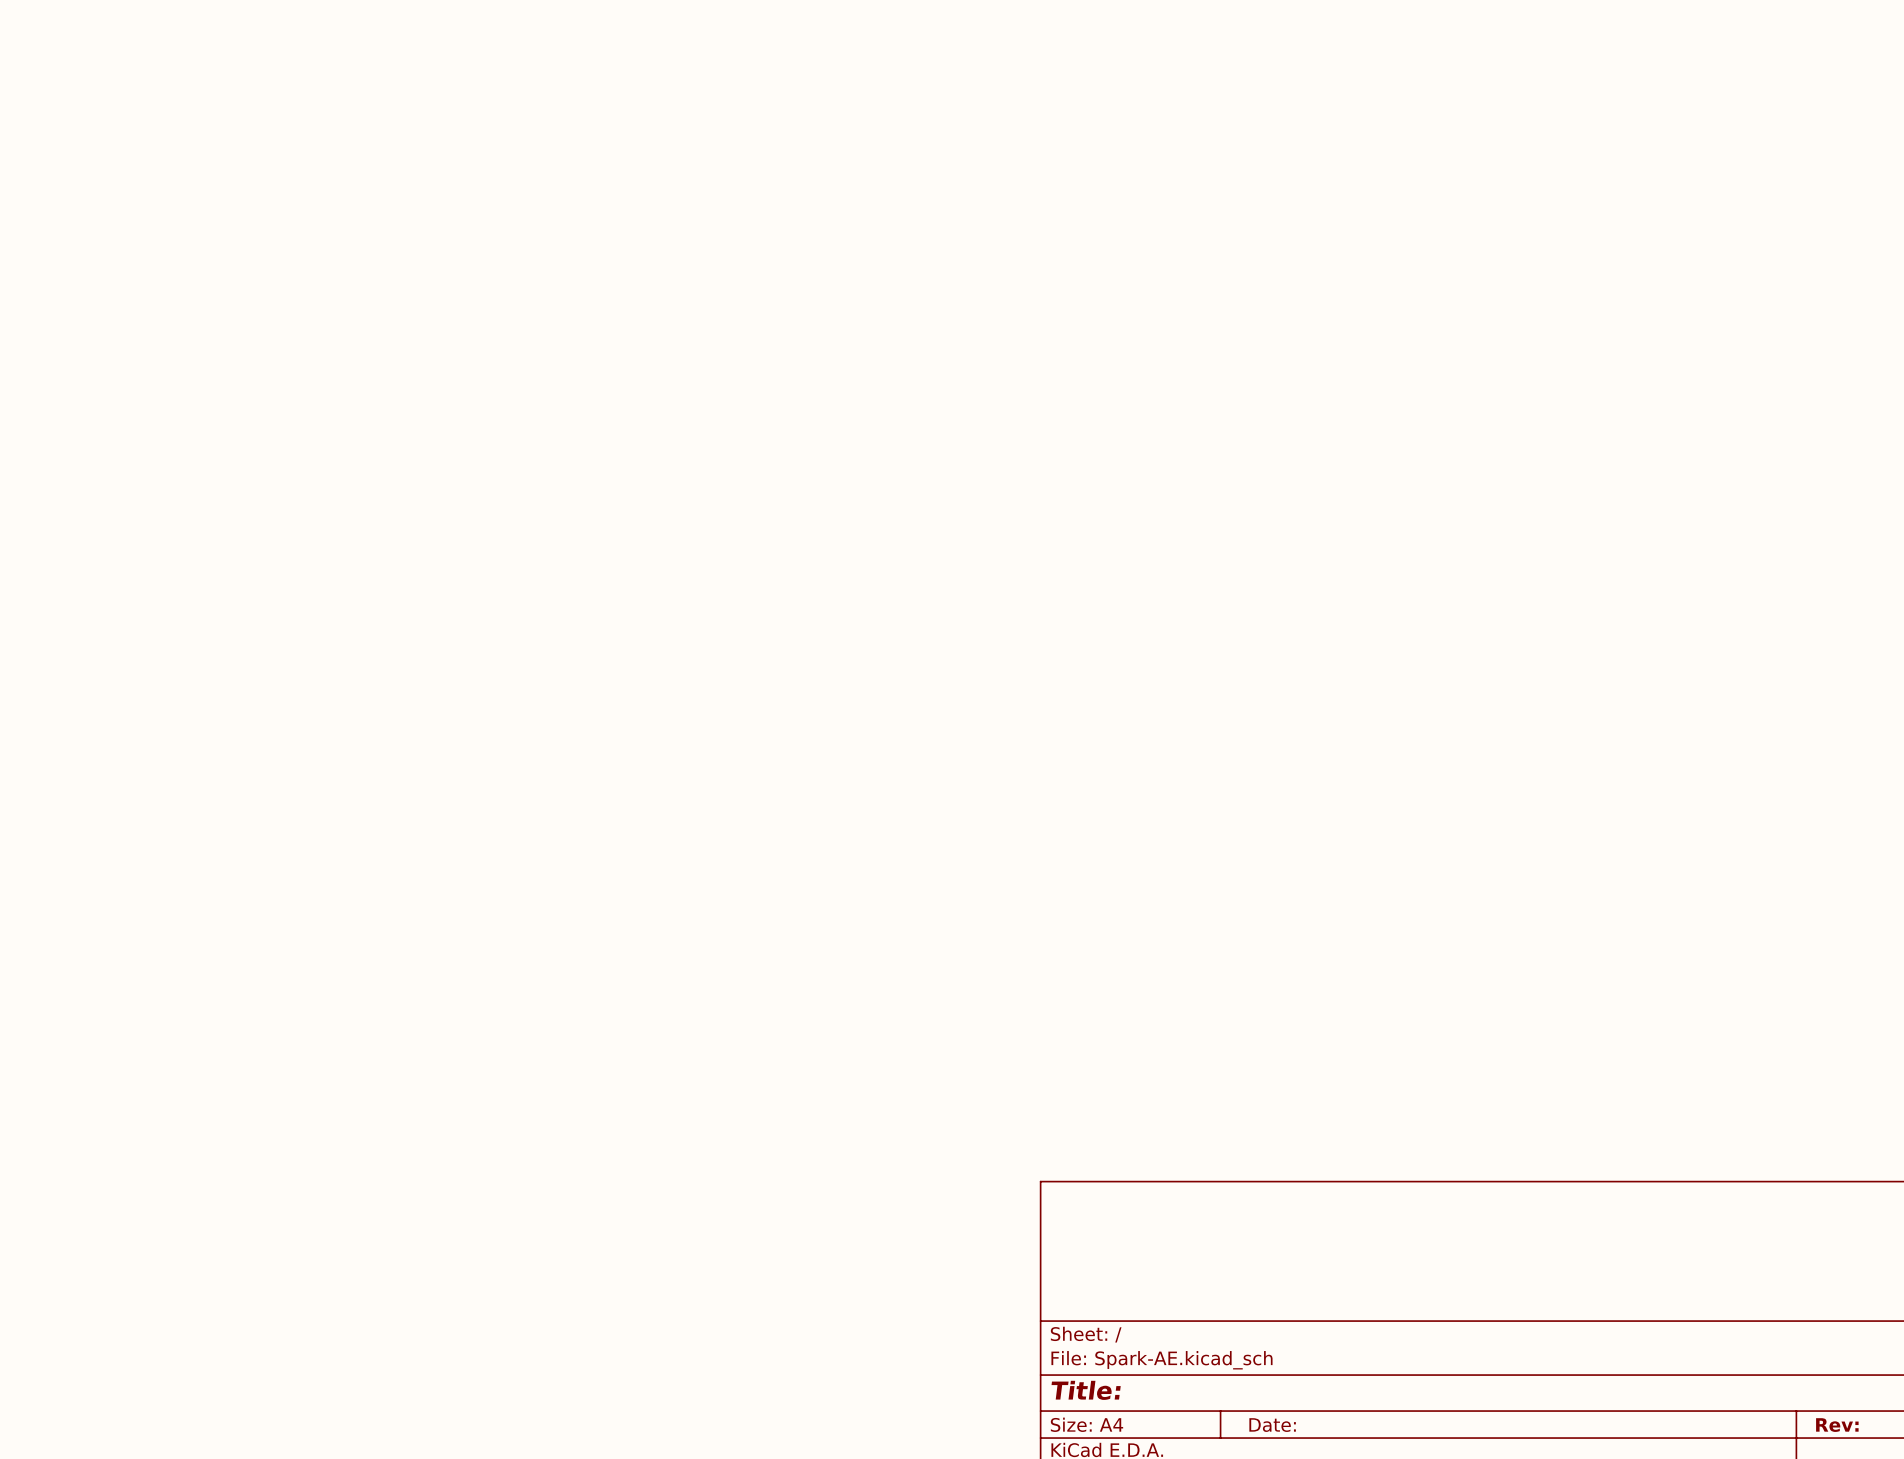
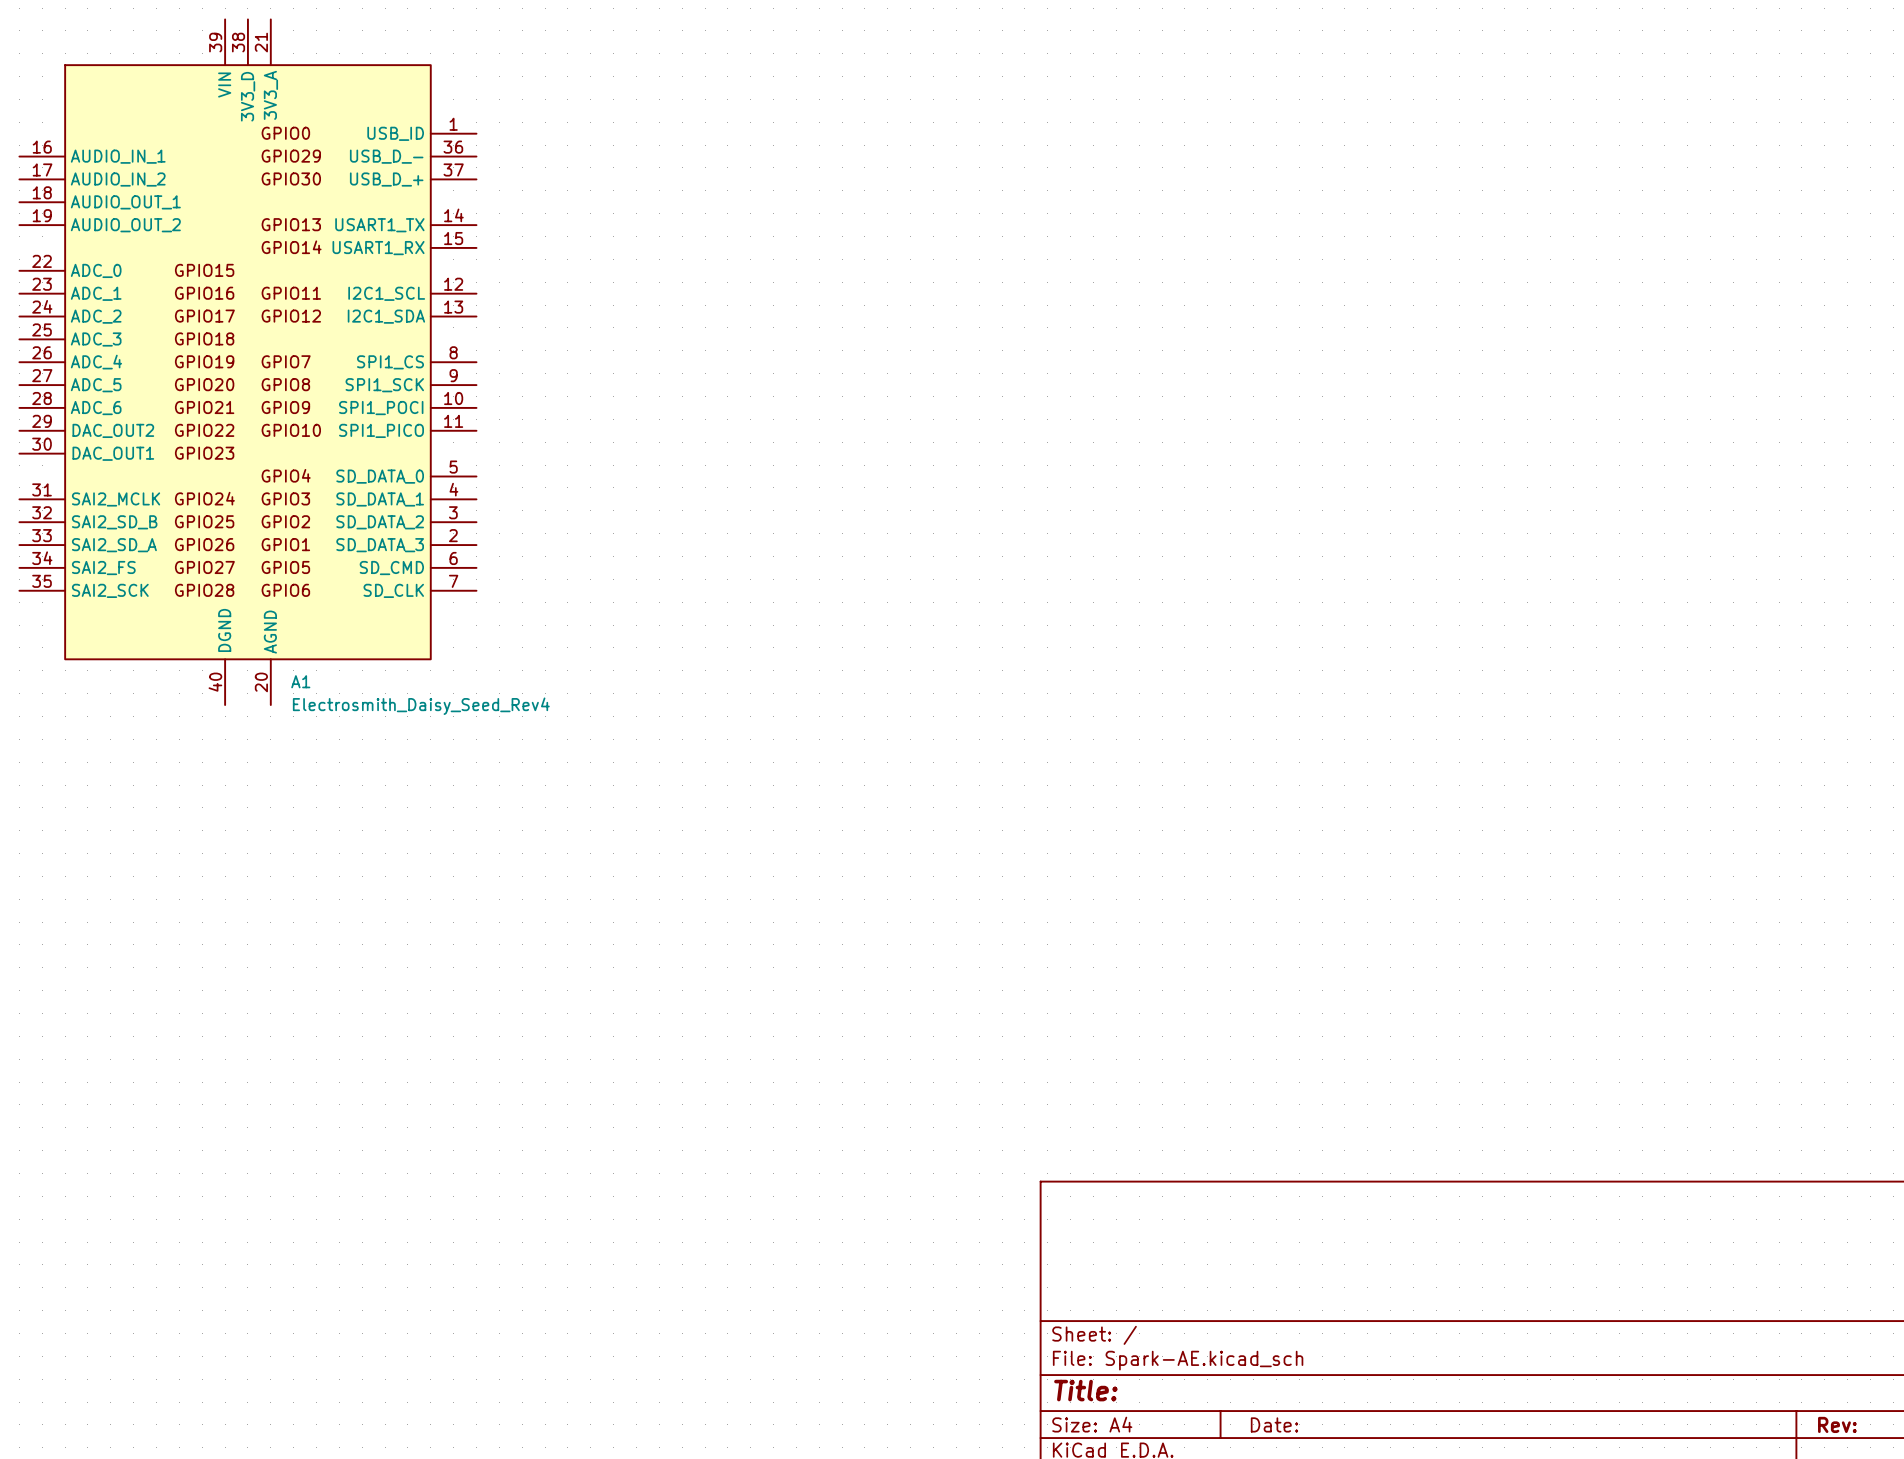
A1: none -> Electrosmith_Daisy_Seed_Rev4 (247, 362)

